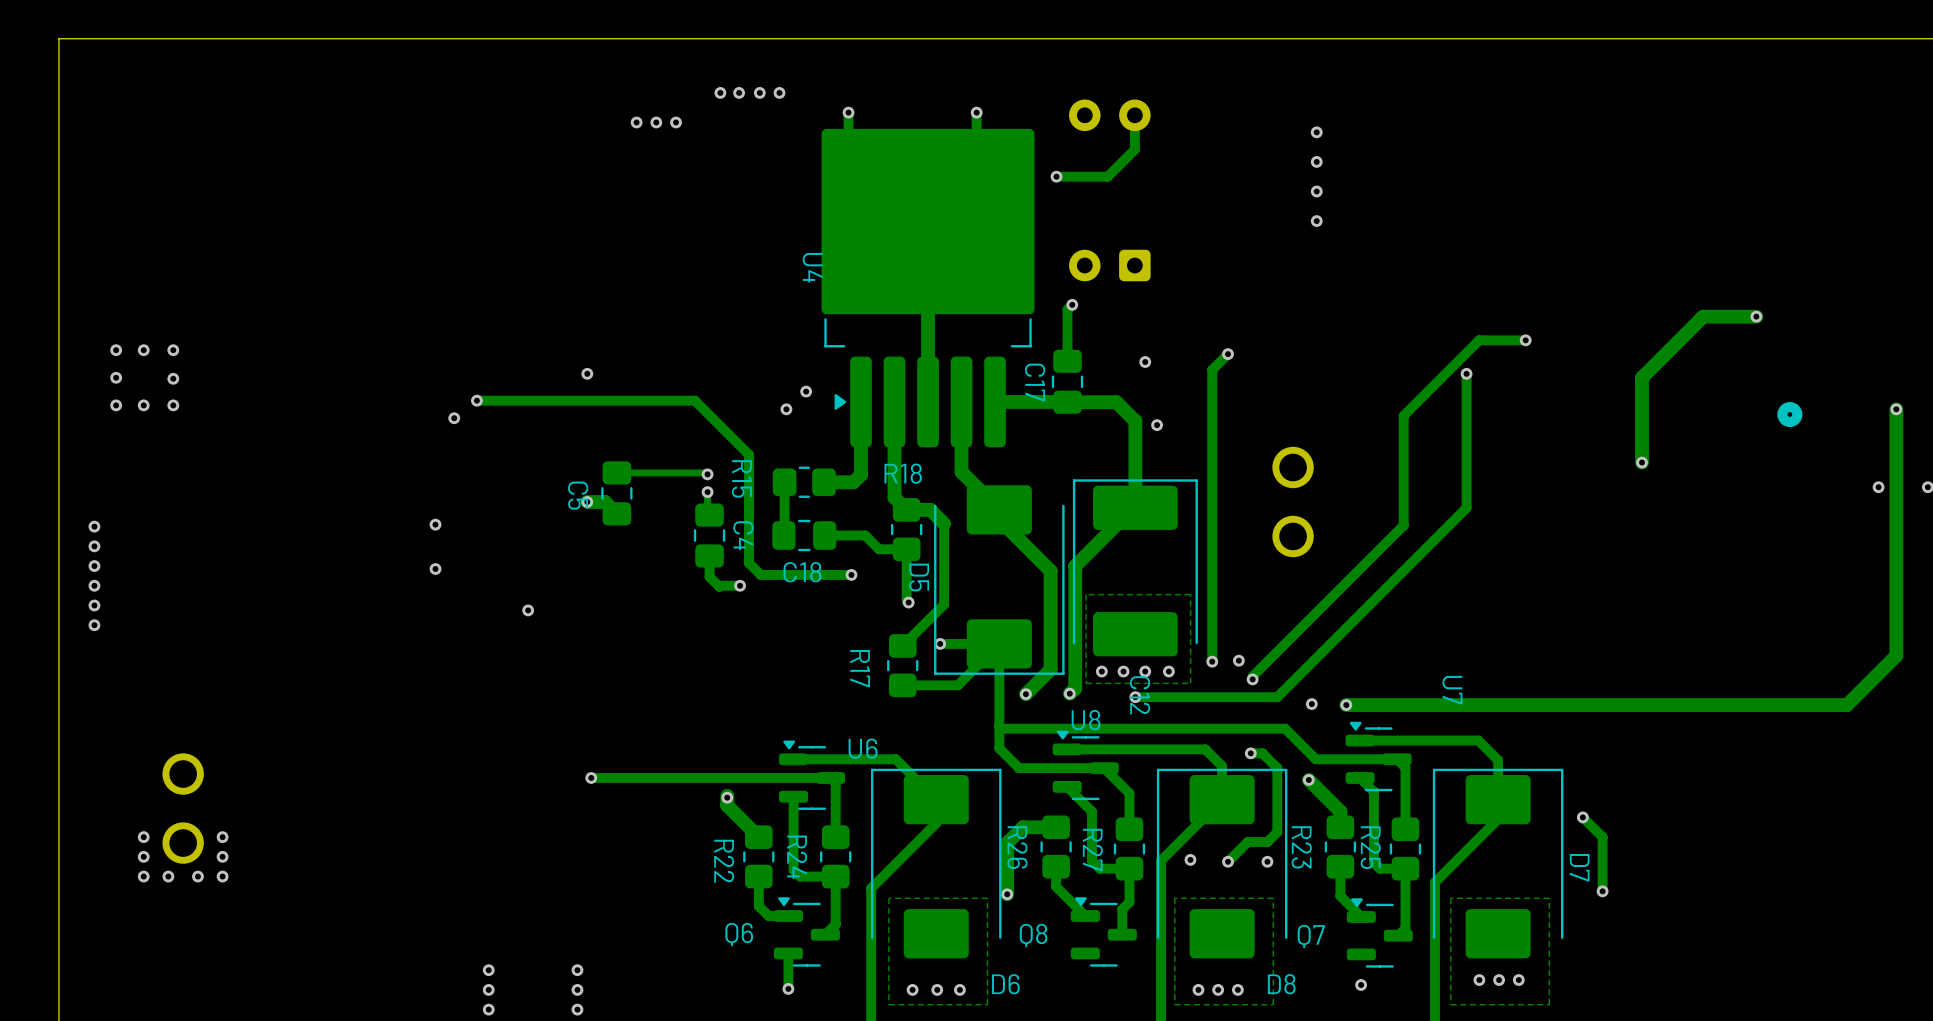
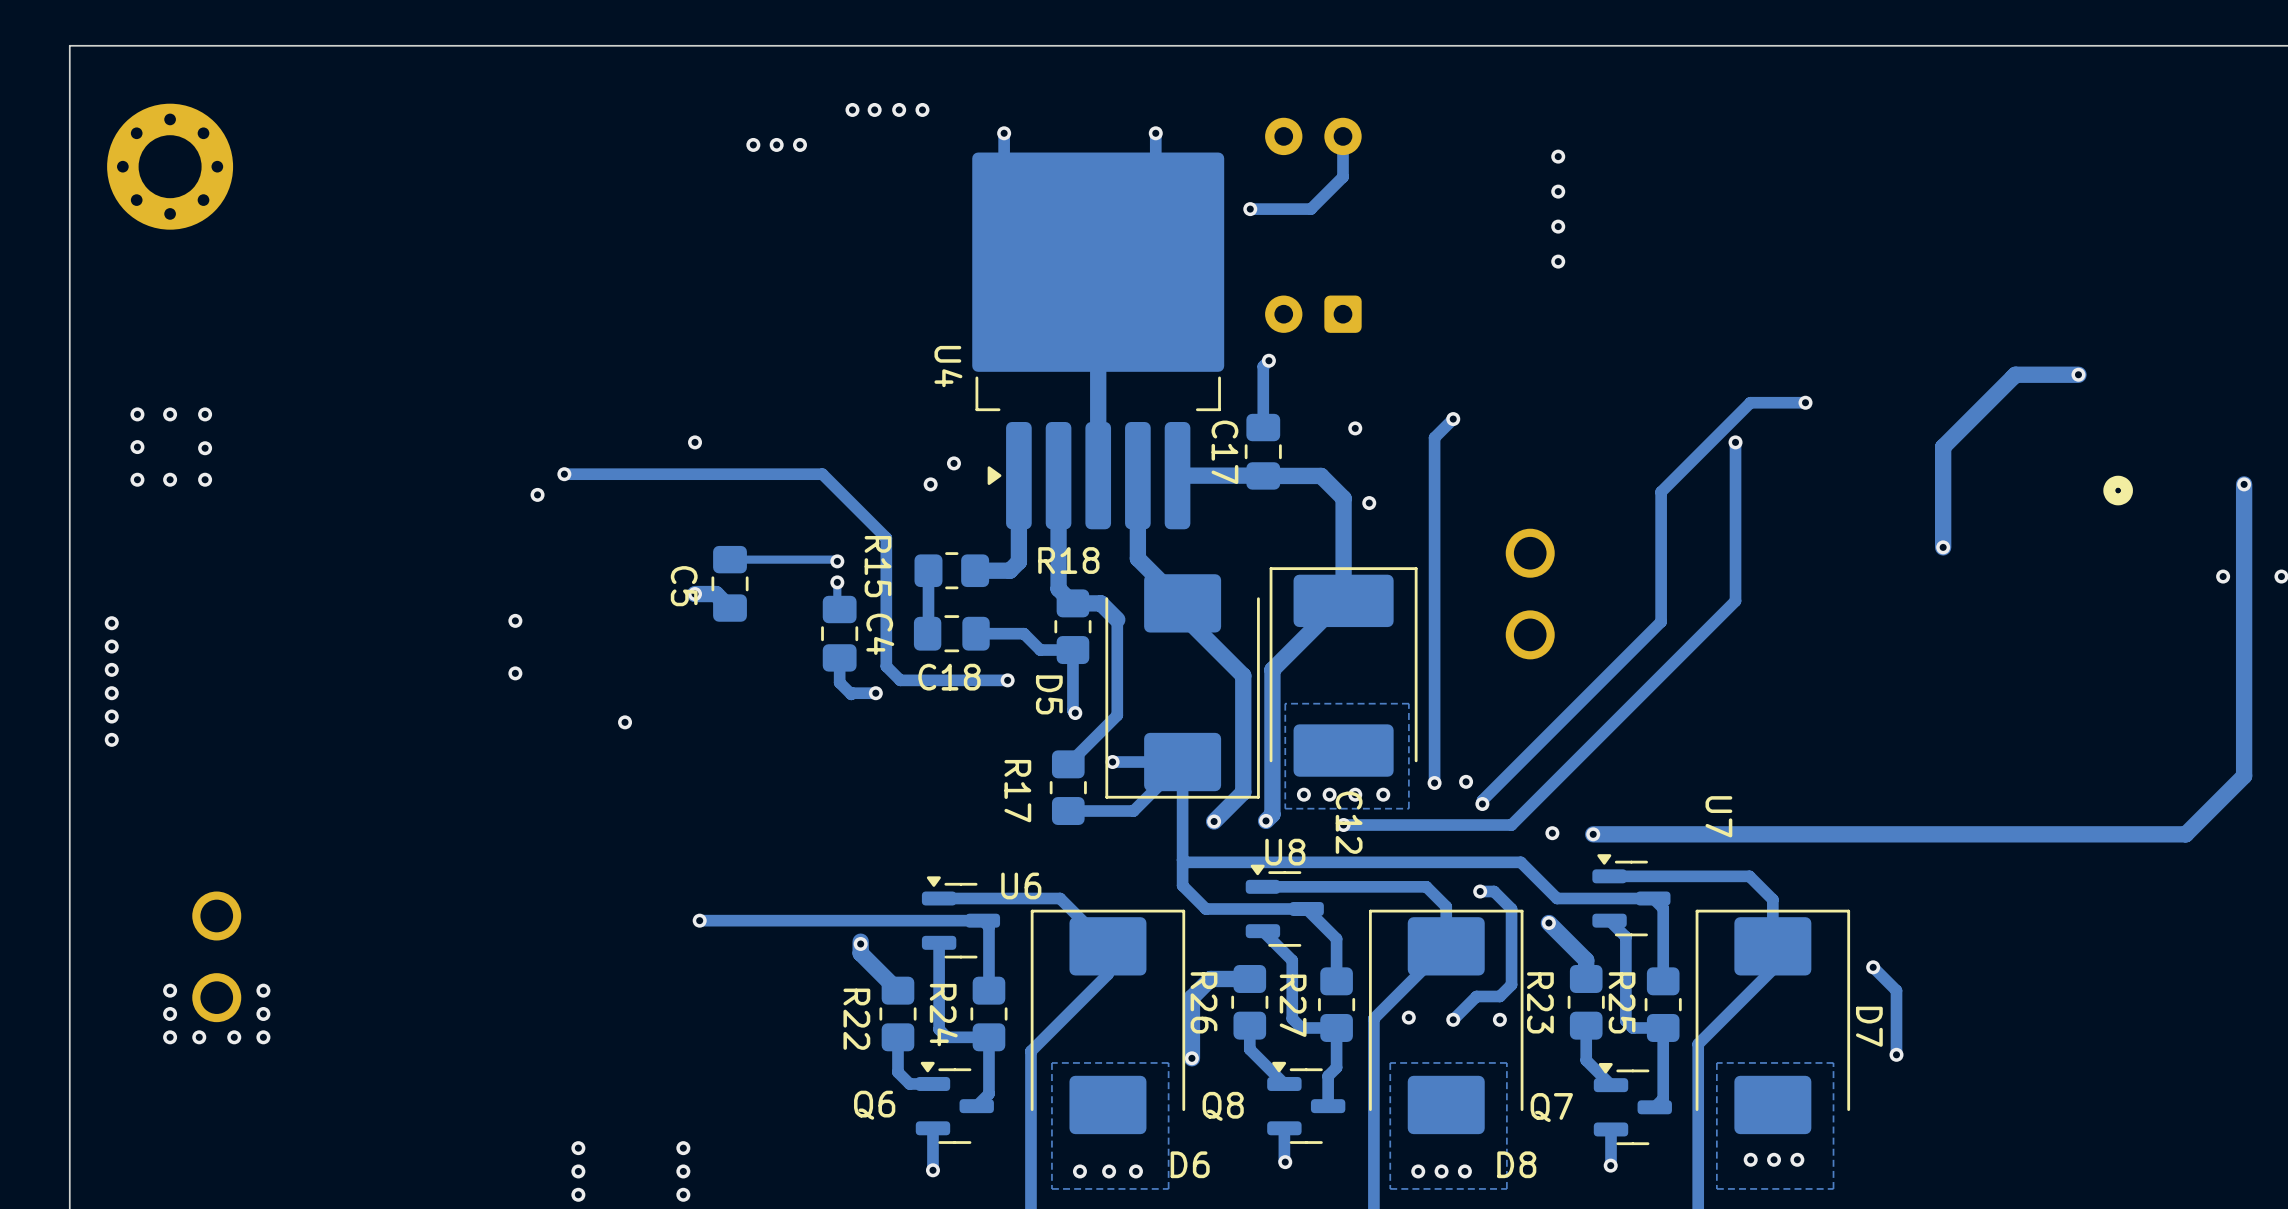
part: none -> (170, 166)
U4 name position: U4 (812, 267) -> U4 (948, 366)
D5 name position: D5 (919, 577) -> D5 (1049, 694)
track: none -> (1284, 1128) (1285, 1162)
track: none -> (1611, 1129) (1611, 1165)
via: none -> (1285, 1162)

